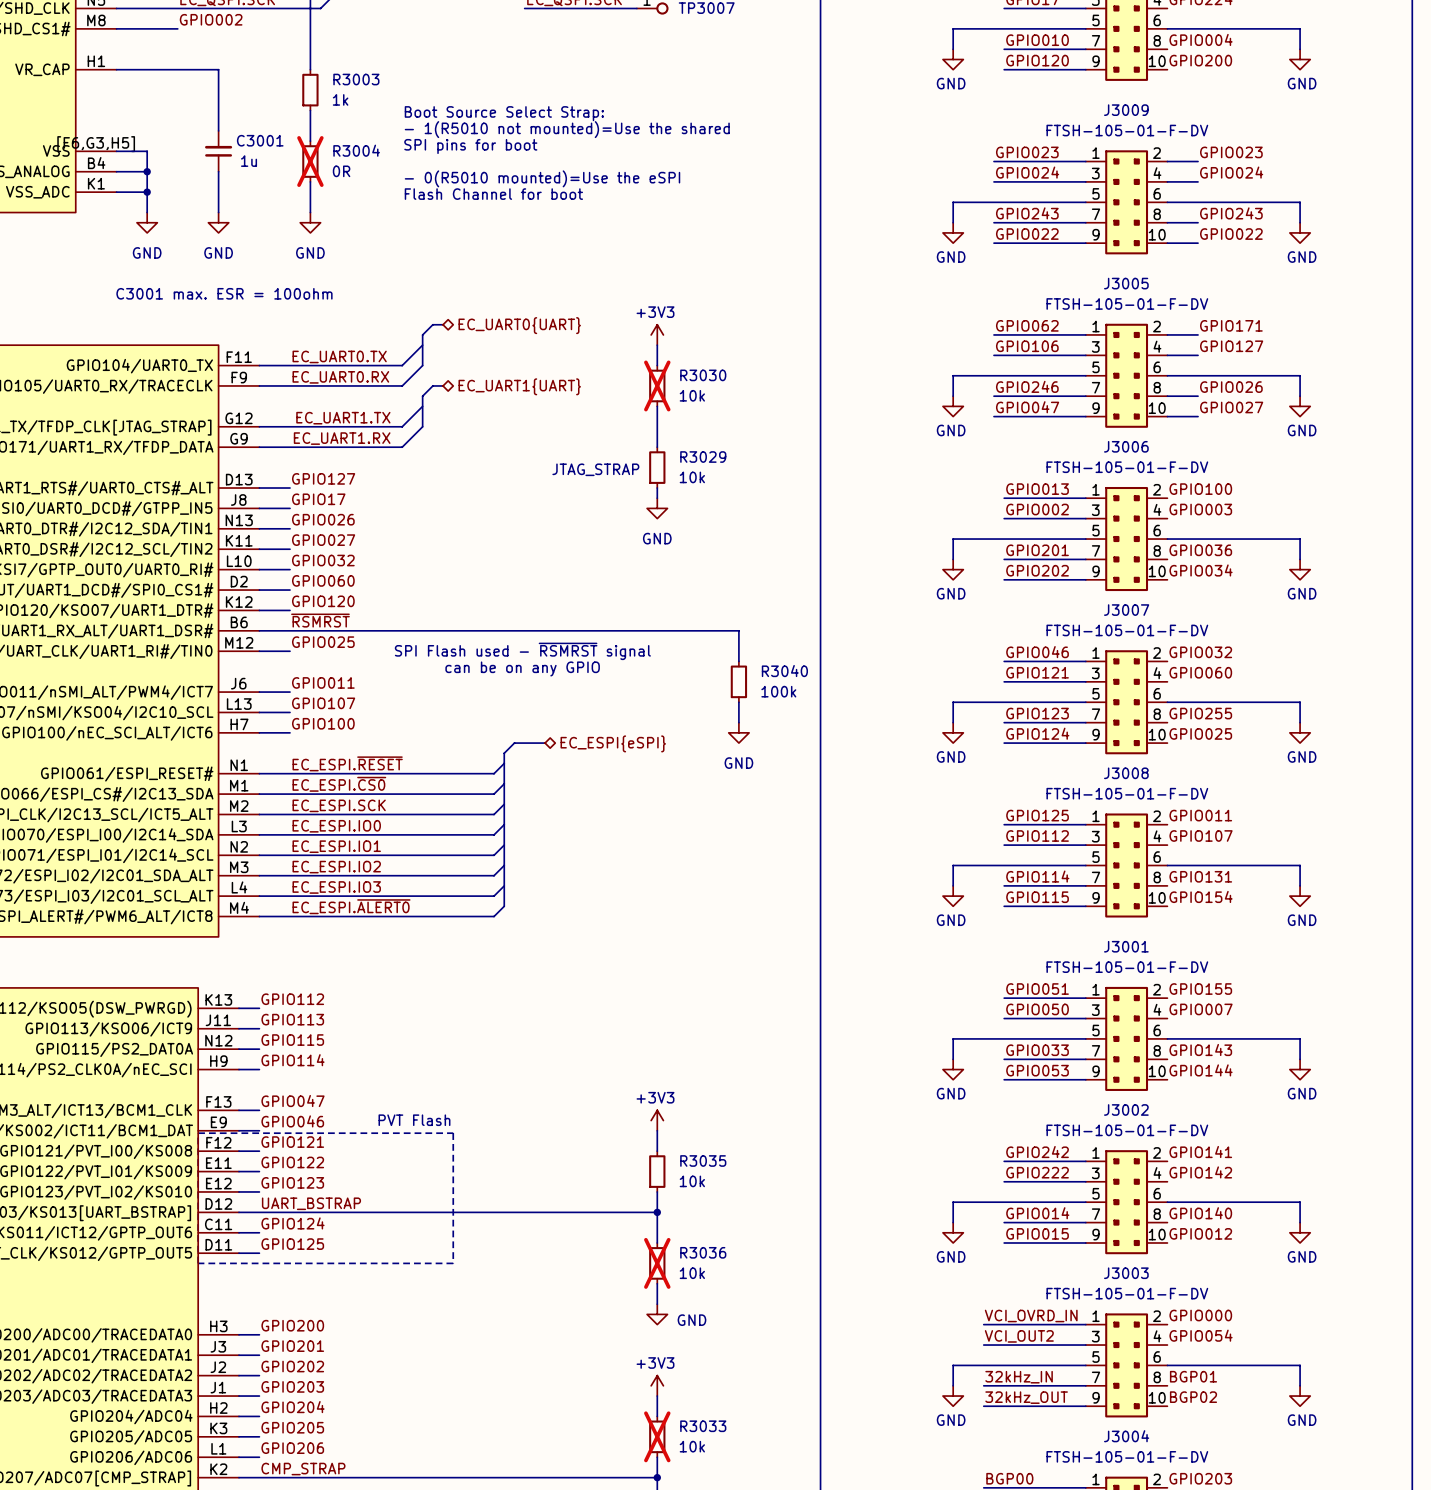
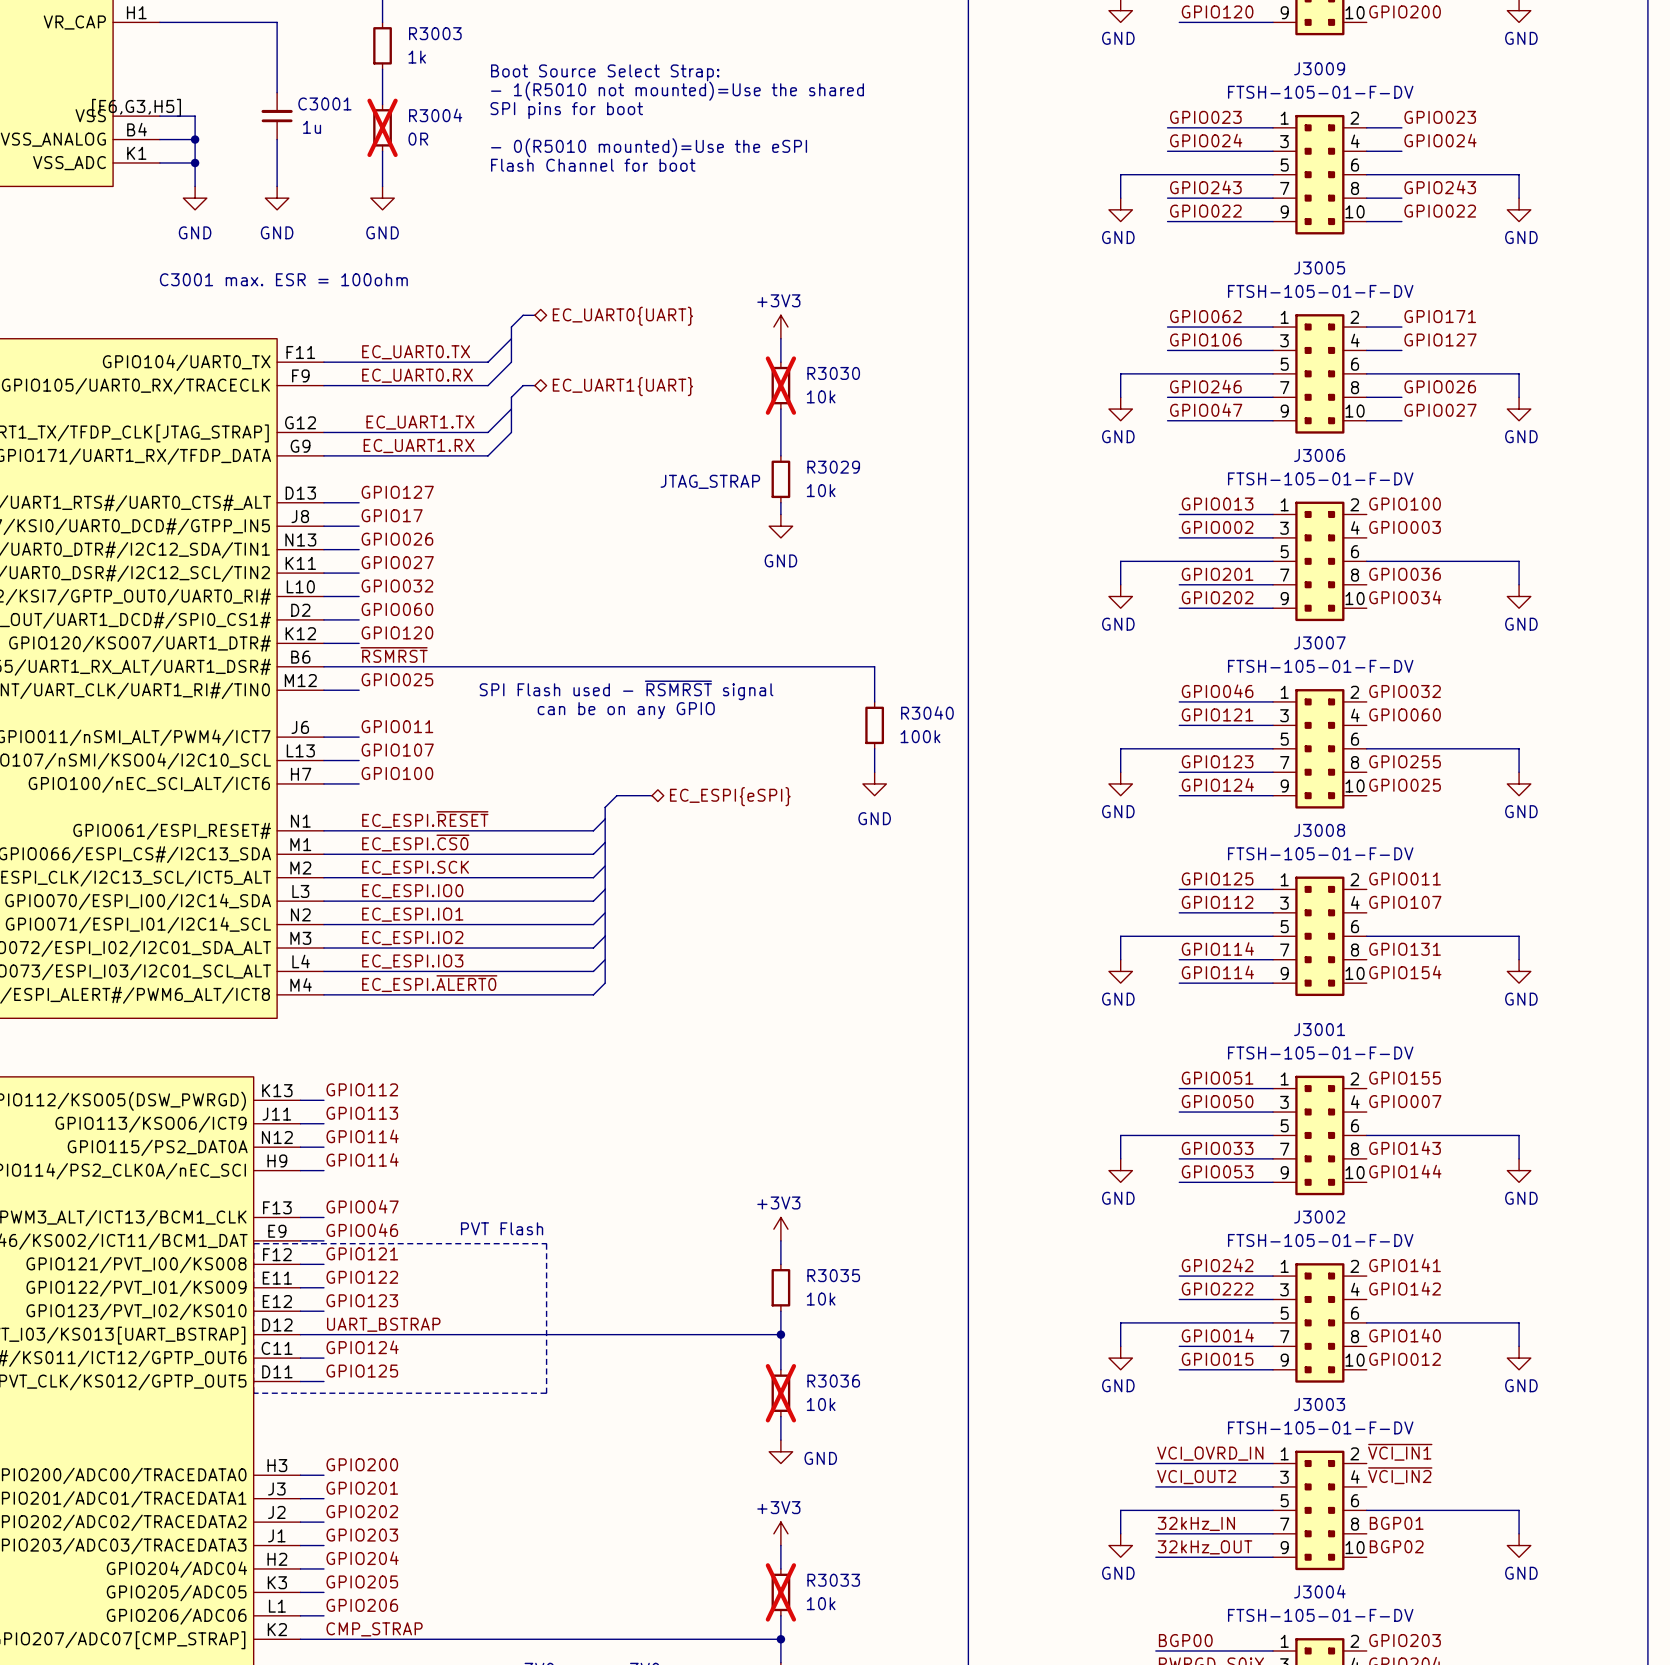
label: GPIO115 (1037, 897) -> GPIO114 (1217, 972)
label: GPIO115 (292, 1040) -> GPIO114 (362, 1136)
label: GPIO000 (1200, 1315) -> ~{VCI_IN1} (1400, 1452)
label: GPIO054 (1201, 1335) -> ~{VCI_IN2} (1400, 1475)

